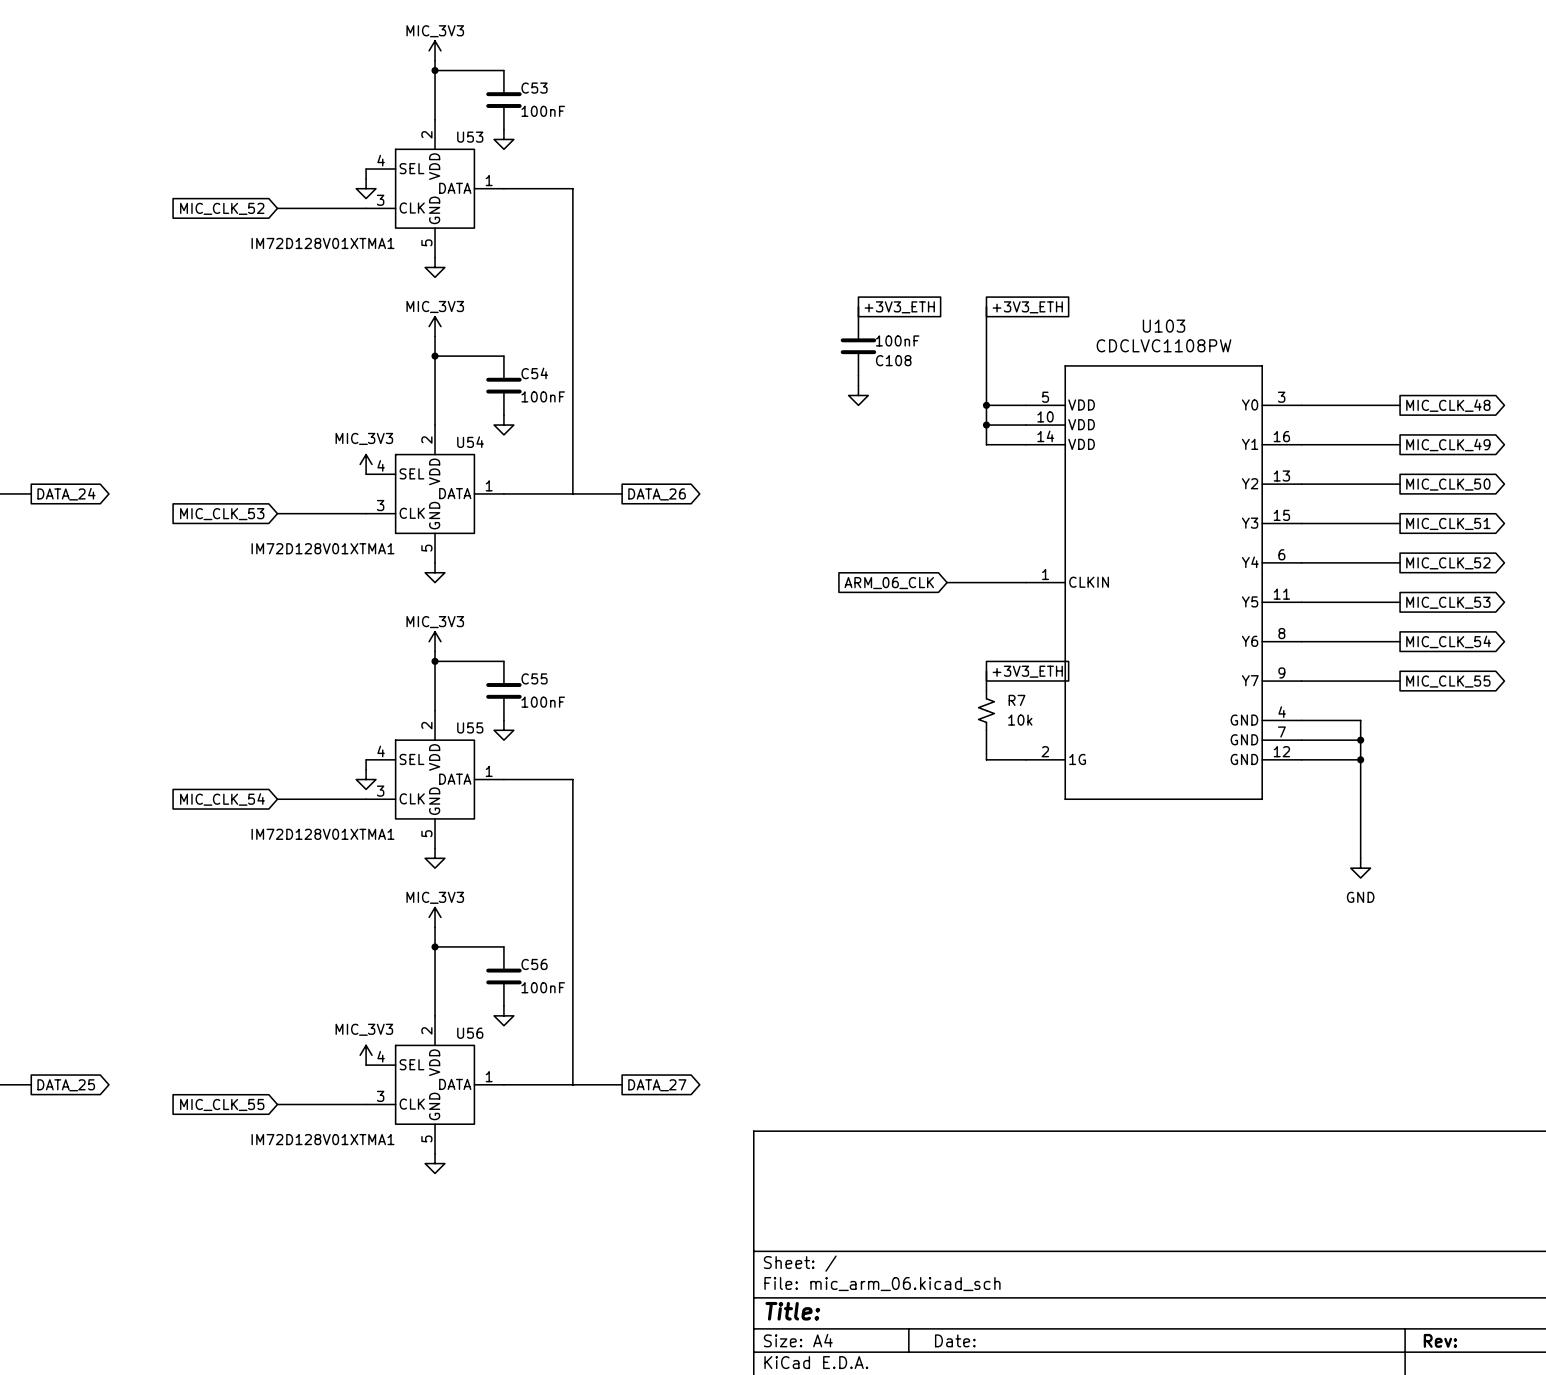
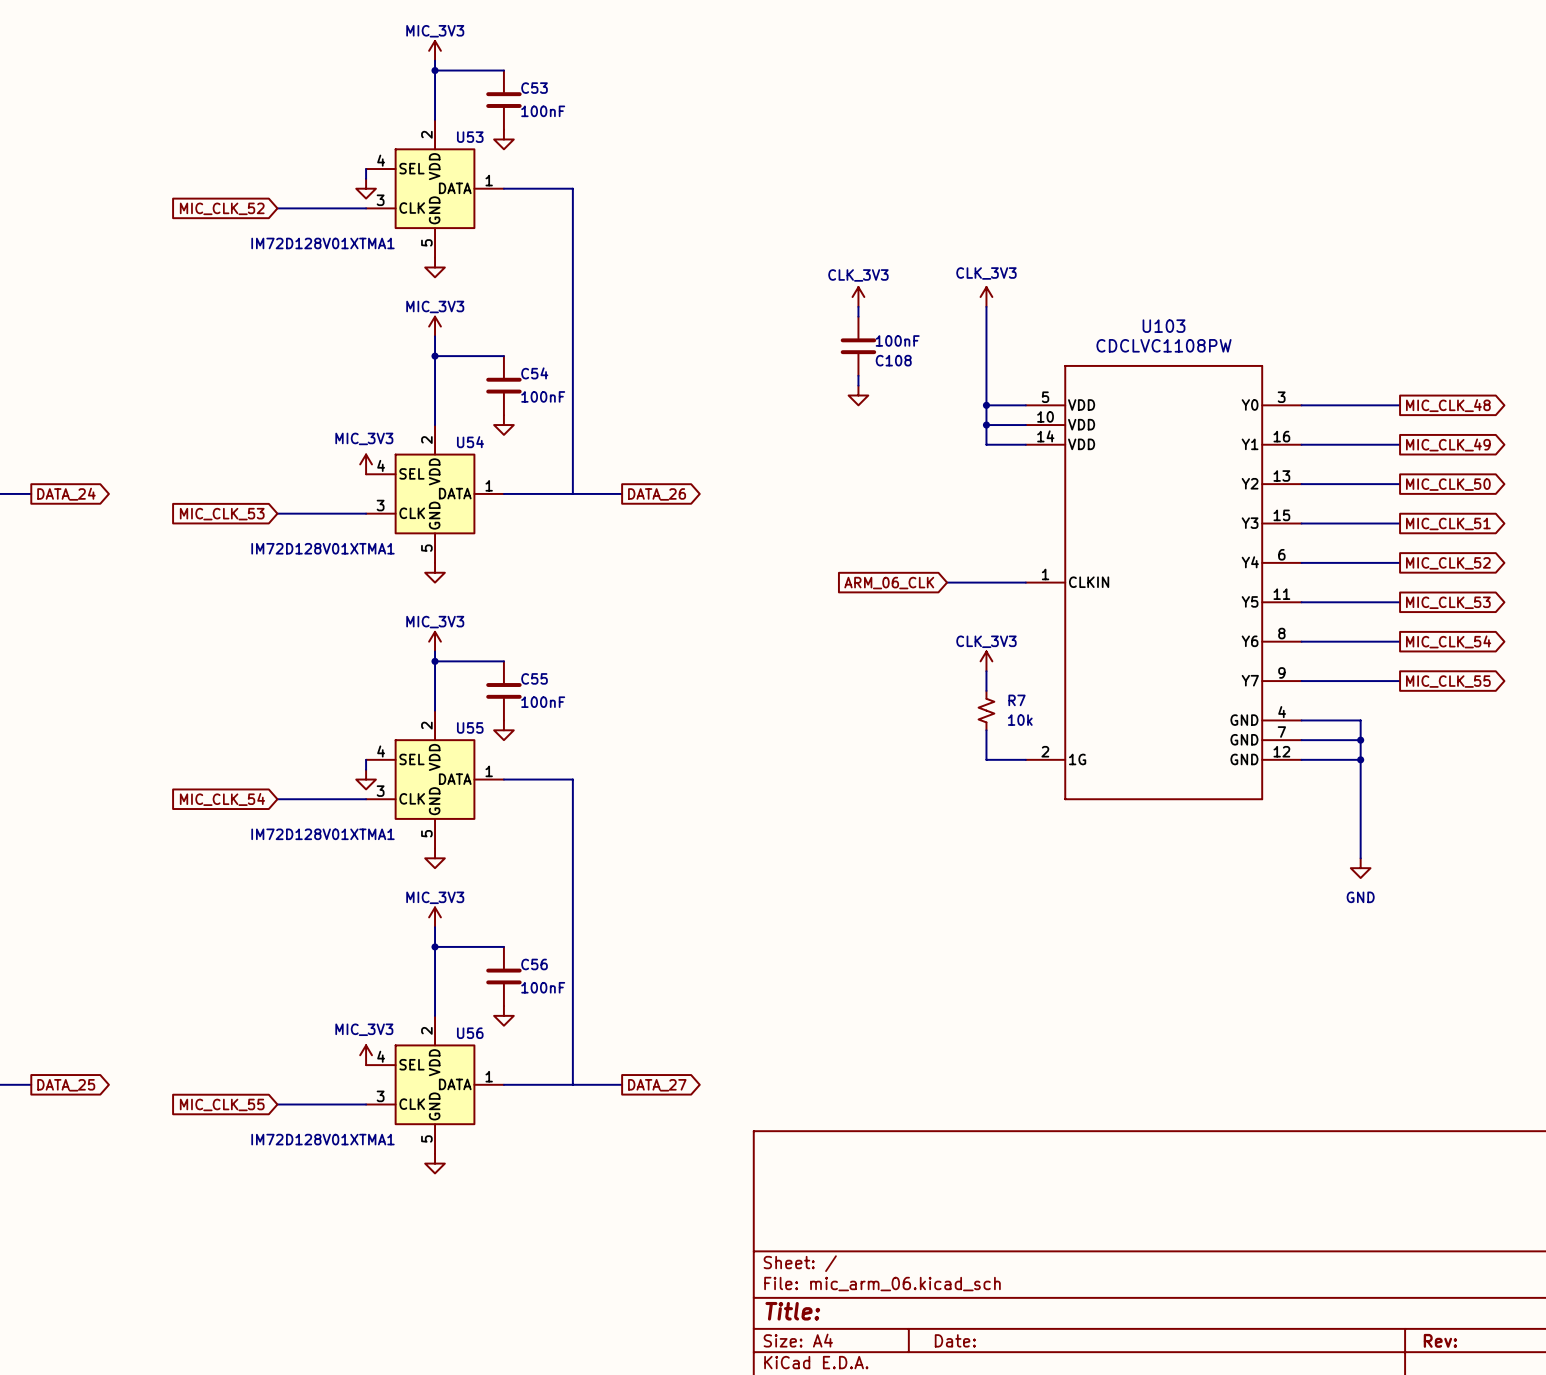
power symbol: none -> CLK_3V3 (858, 297)
power symbol: none -> CLK_3V3 (986, 297)
global label: +3V3_ETH (899, 307) -> none
global label: +3V3_ETH (1027, 307) -> none
power symbol: none -> CLK_3V3 (986, 661)
global label: +3V3_ETH (1027, 671) -> none

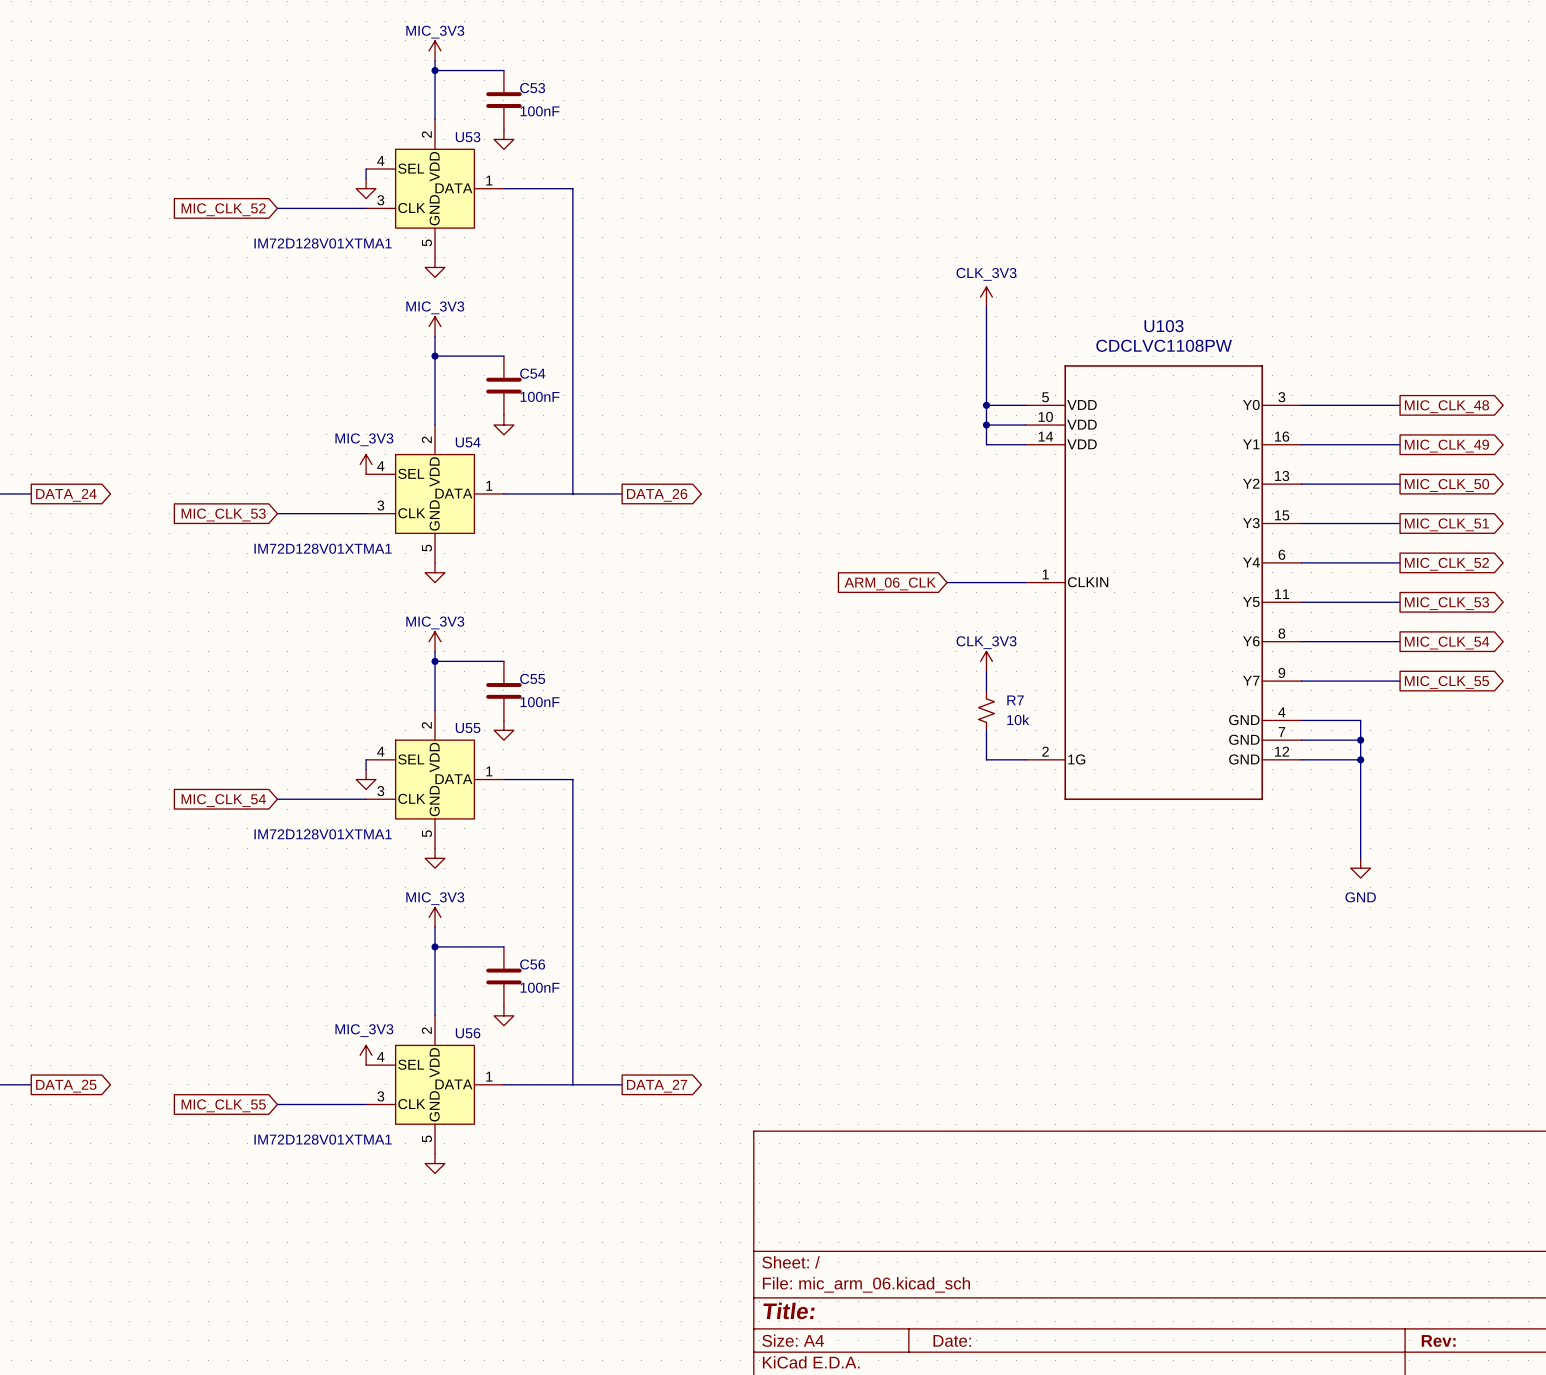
power symbol: CLK_3V3 (858, 297) -> none
wire: (858, 306) (858, 316) -> none
C108: 100nF (858, 346) -> none
wire: (858, 375) (858, 385) -> none
power symbol: (858, 395) -> none

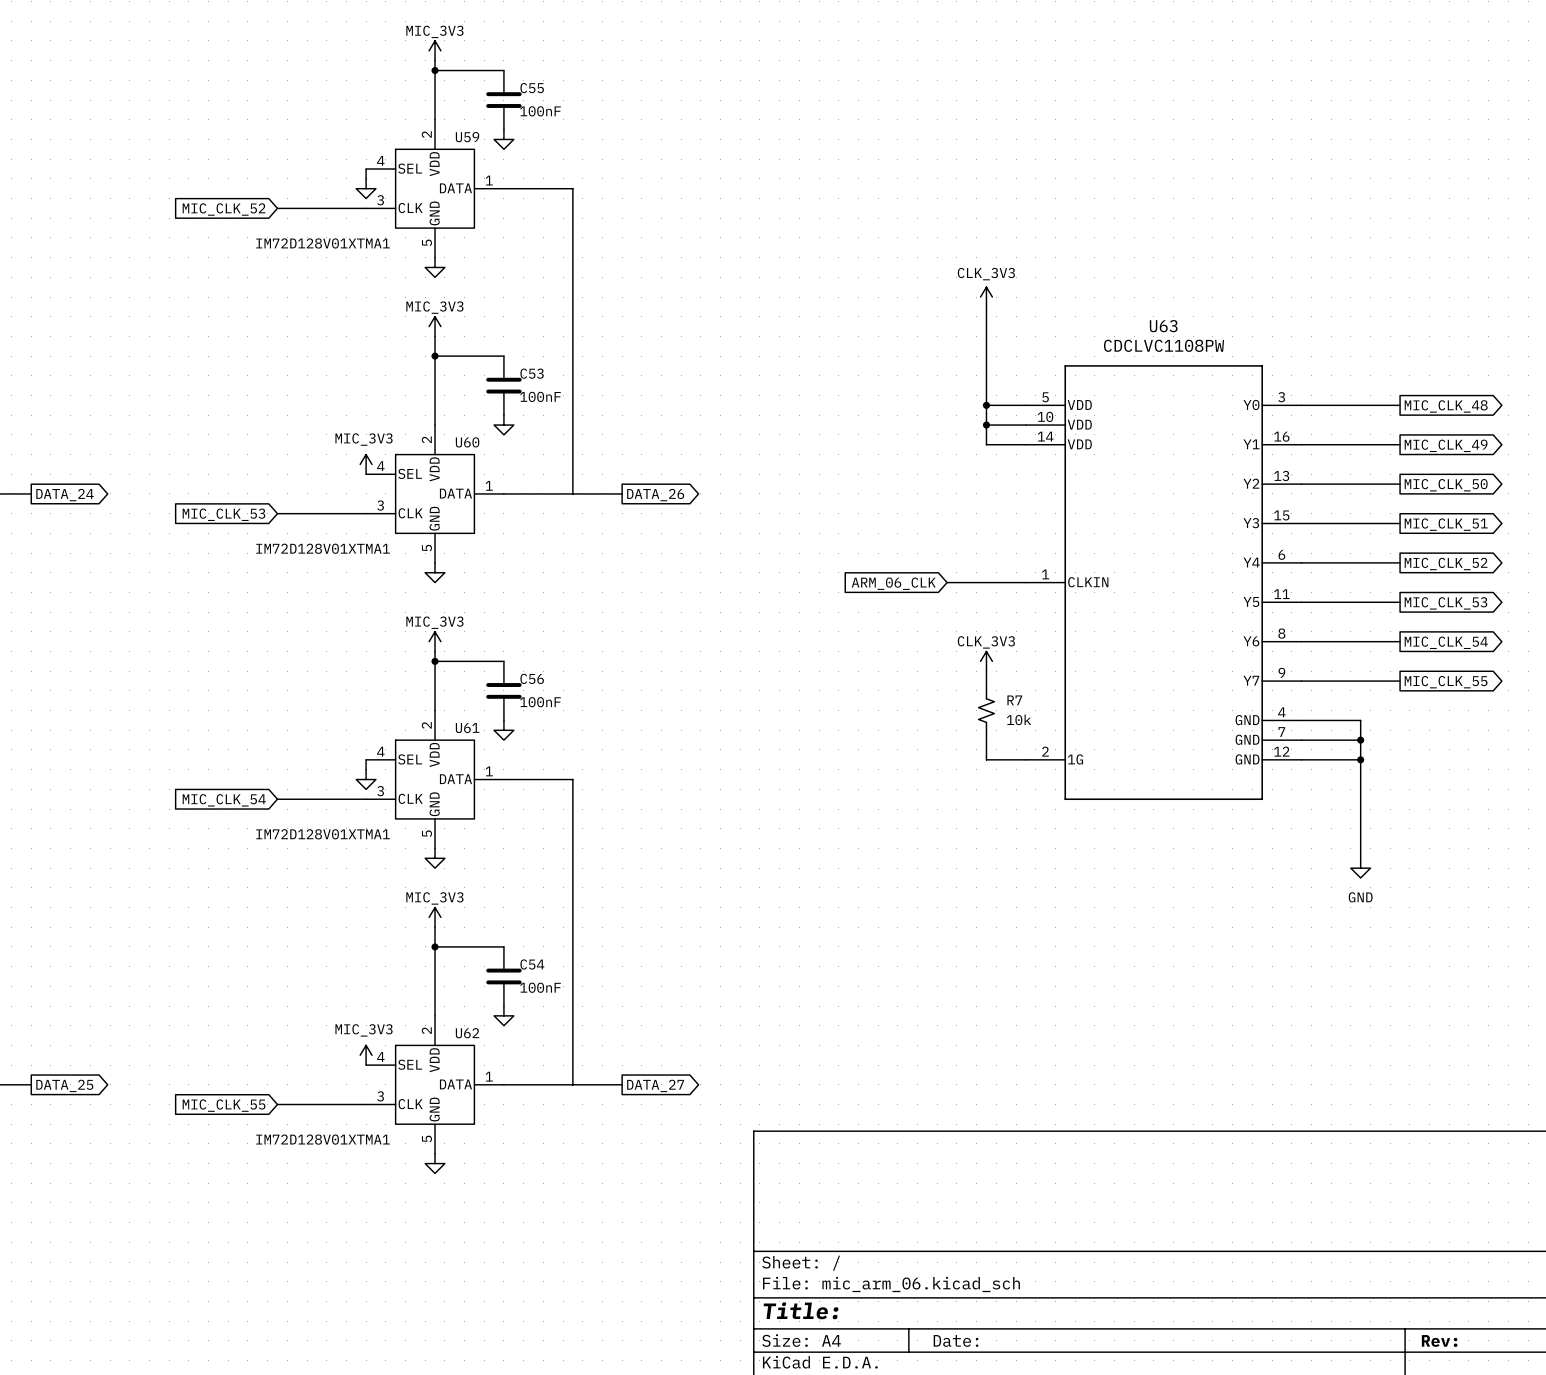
C53 name: C53 (532, 88) -> C55 (532, 88)
U53 name: U53 (468, 137) -> U59 (467, 137)
U103 name: U103 (1164, 326) -> U63 (1163, 326)
C54 name: C54 (532, 373) -> C53 (532, 373)
U54 name: U54 (468, 442) -> U60 (467, 442)
C55 name: C55 (532, 678) -> C56 (532, 678)
U55 name: U55 (468, 728) -> U61 (467, 728)
C56 name: C56 (532, 964) -> C54 (532, 964)
U56 name: U56 (468, 1033) -> U62 (467, 1033)

